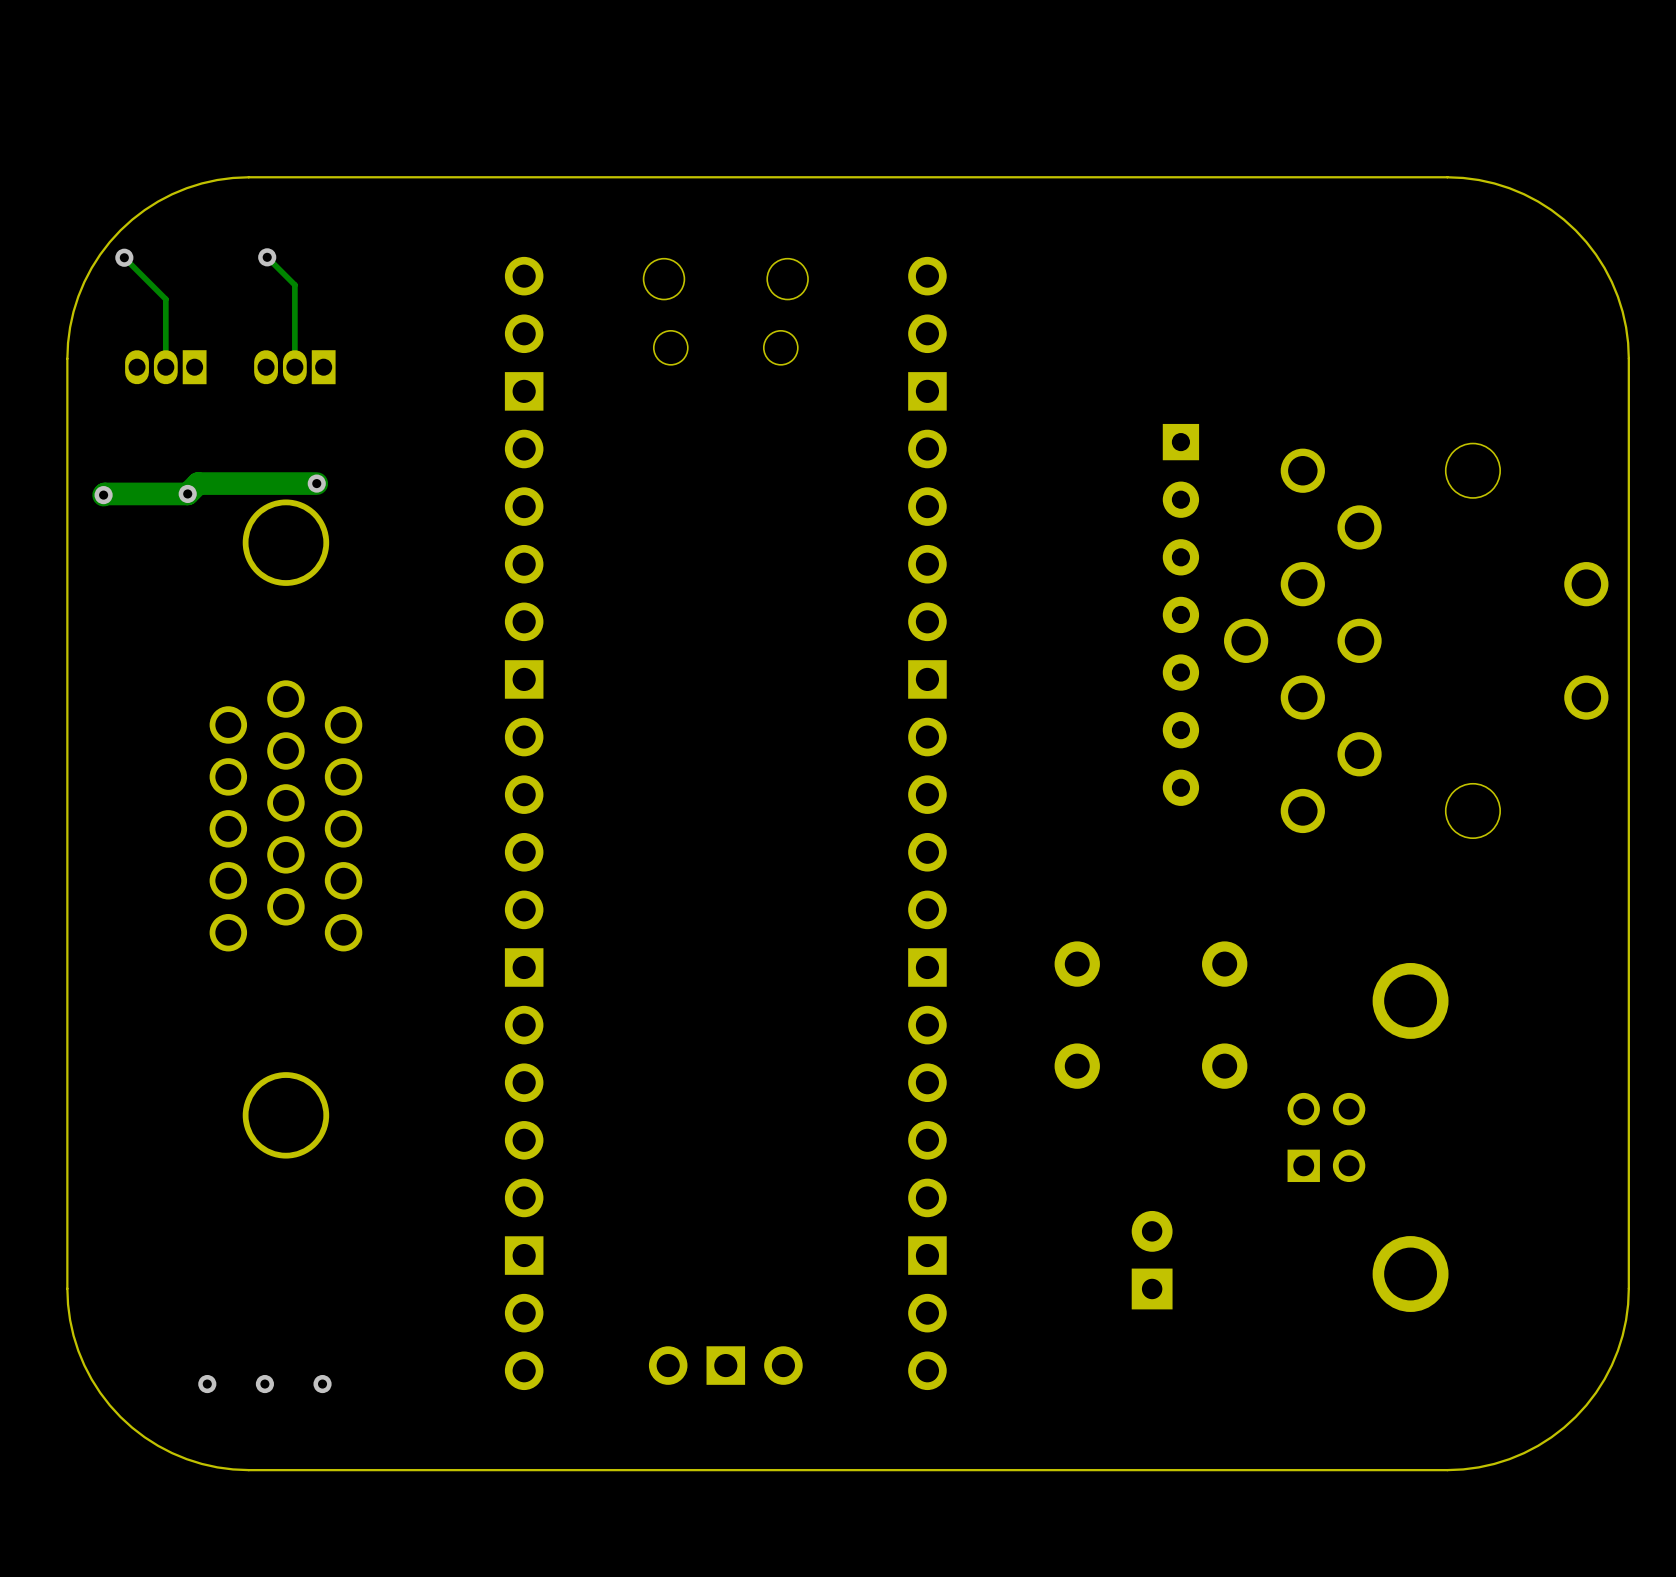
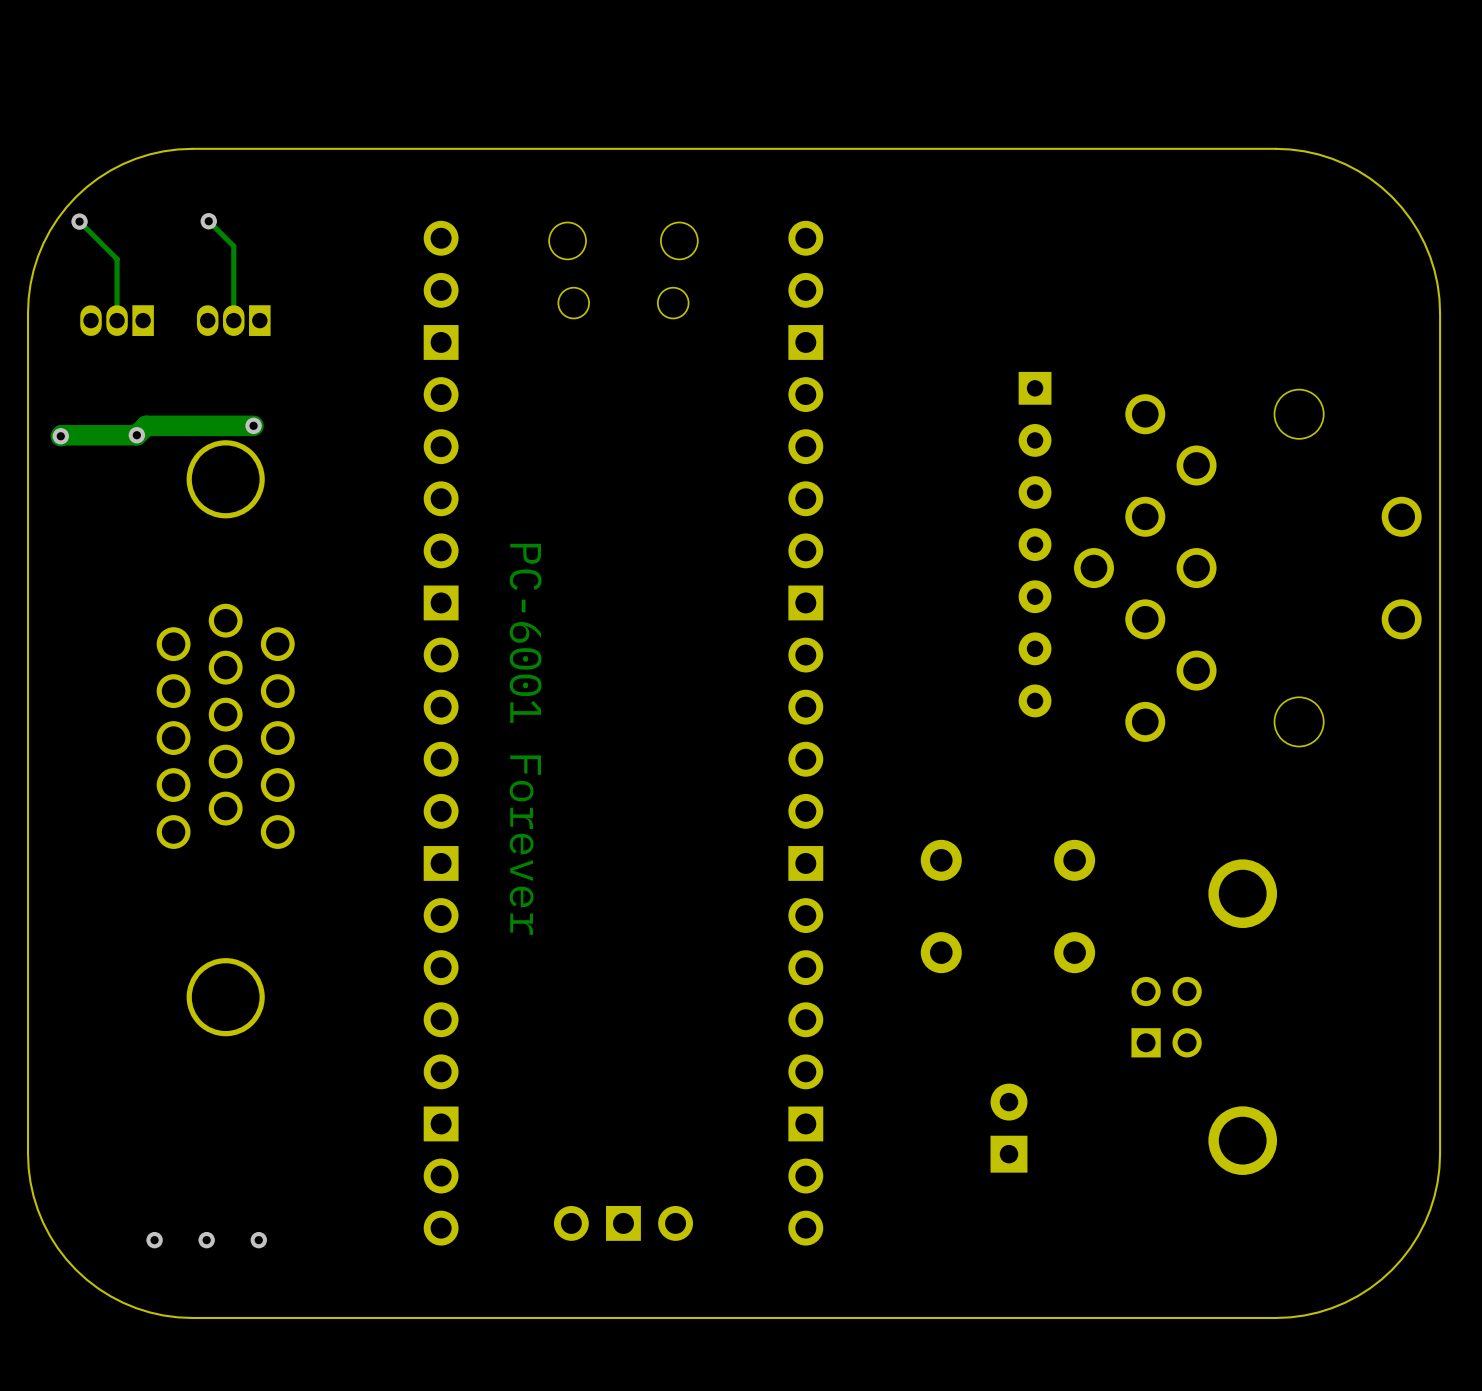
text: none -> PC-6001 Forever (525, 739)

